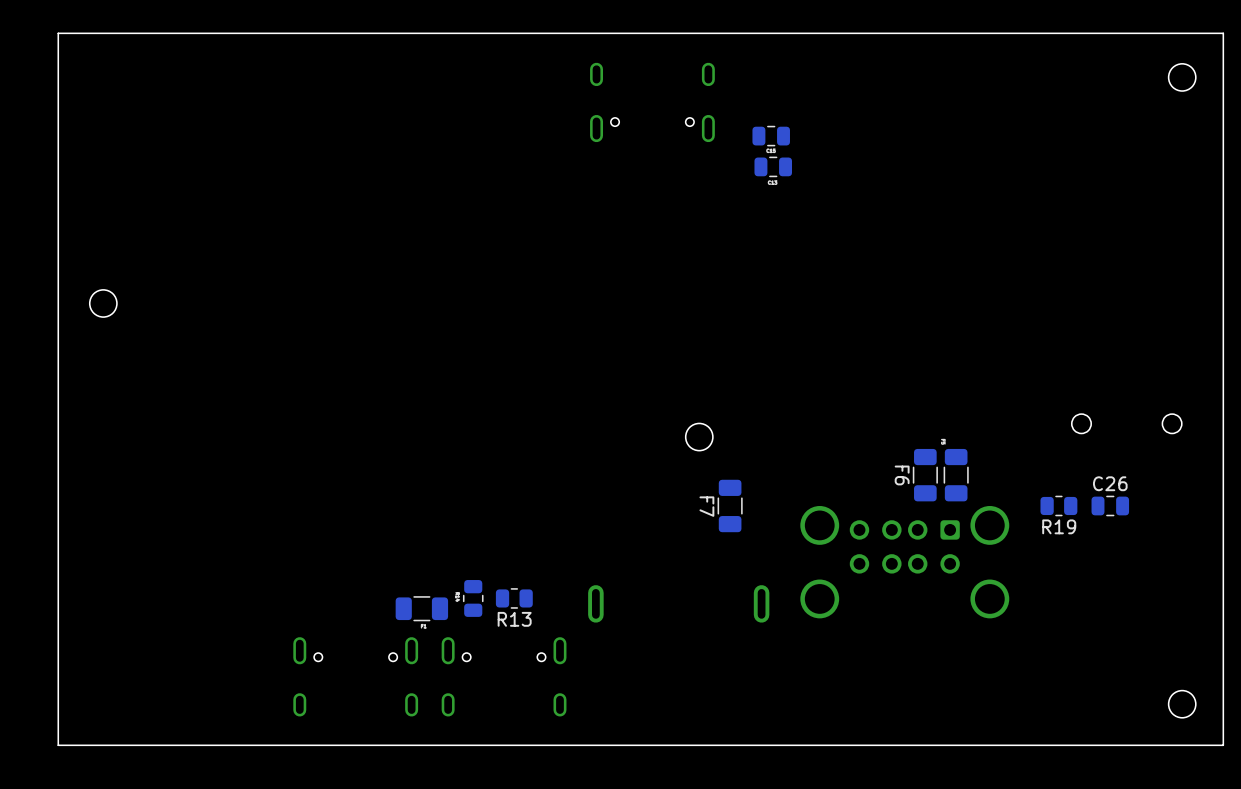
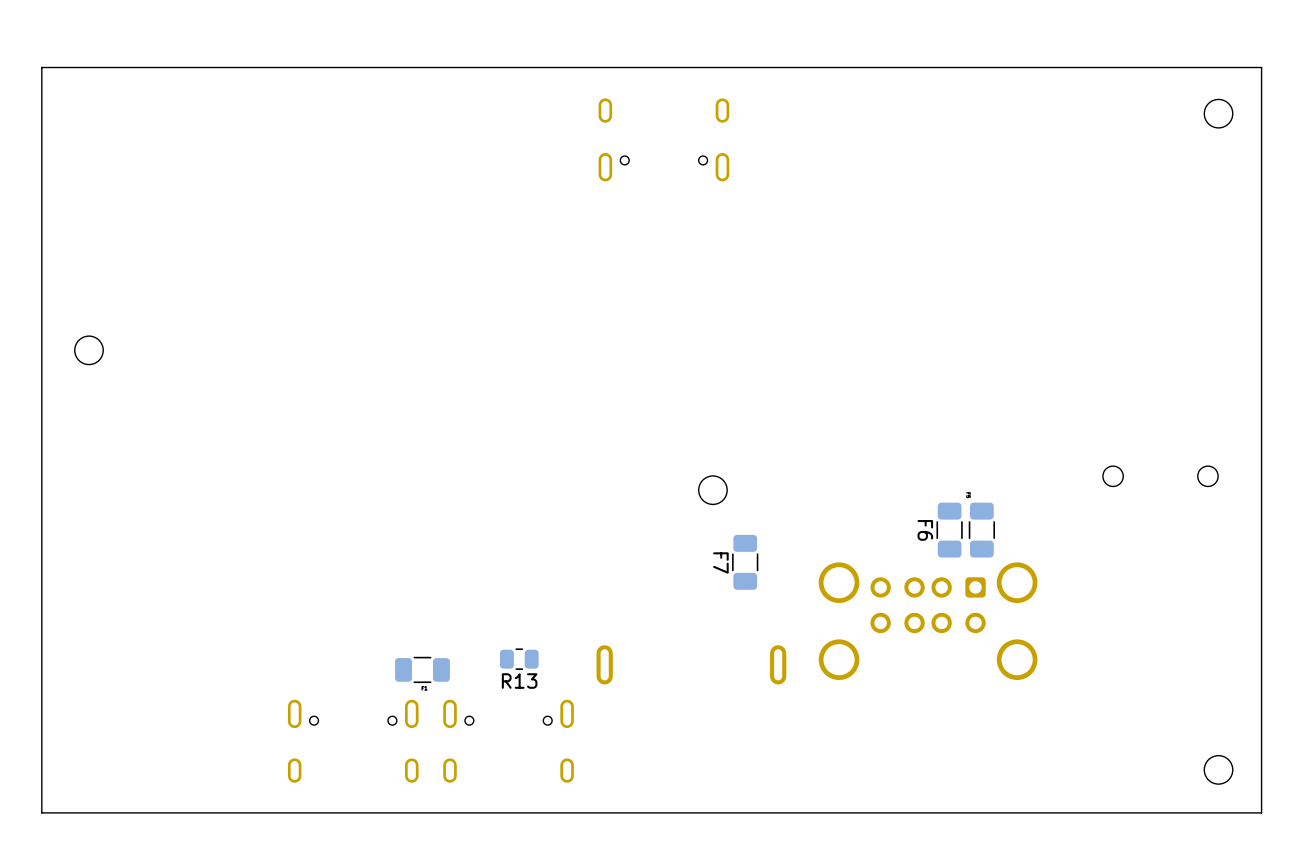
part: (771, 136) -> none
part: (773, 166) -> none
R19: (1058, 505) -> none
C26: (1110, 505) -> none
part: (473, 598) -> none

